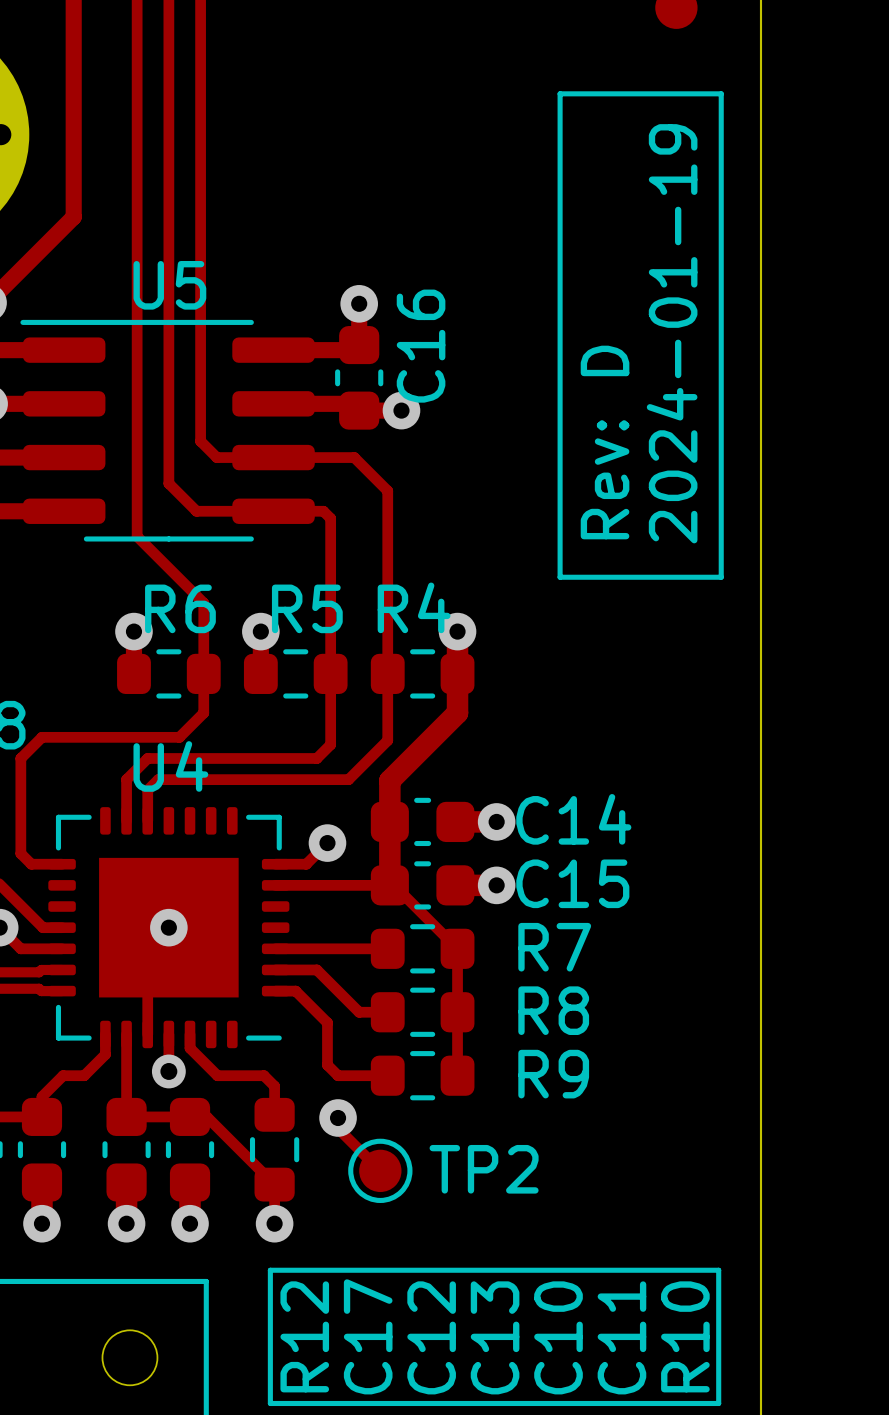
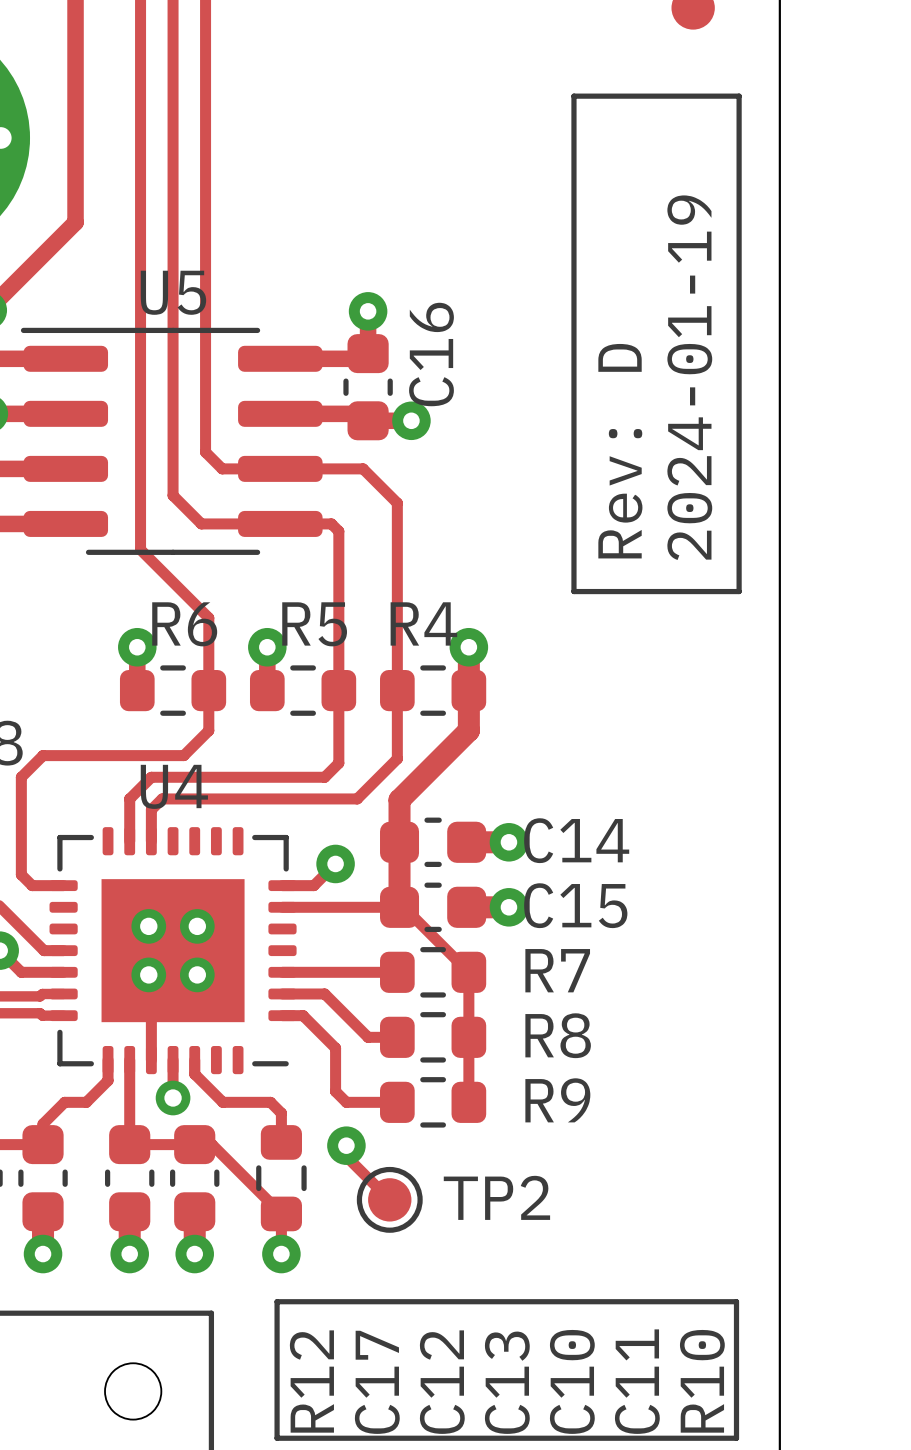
via: none -> (148, 926)
via: none -> (197, 926)
via: (168, 927) -> none
via: none -> (148, 974)
via: none -> (197, 974)

